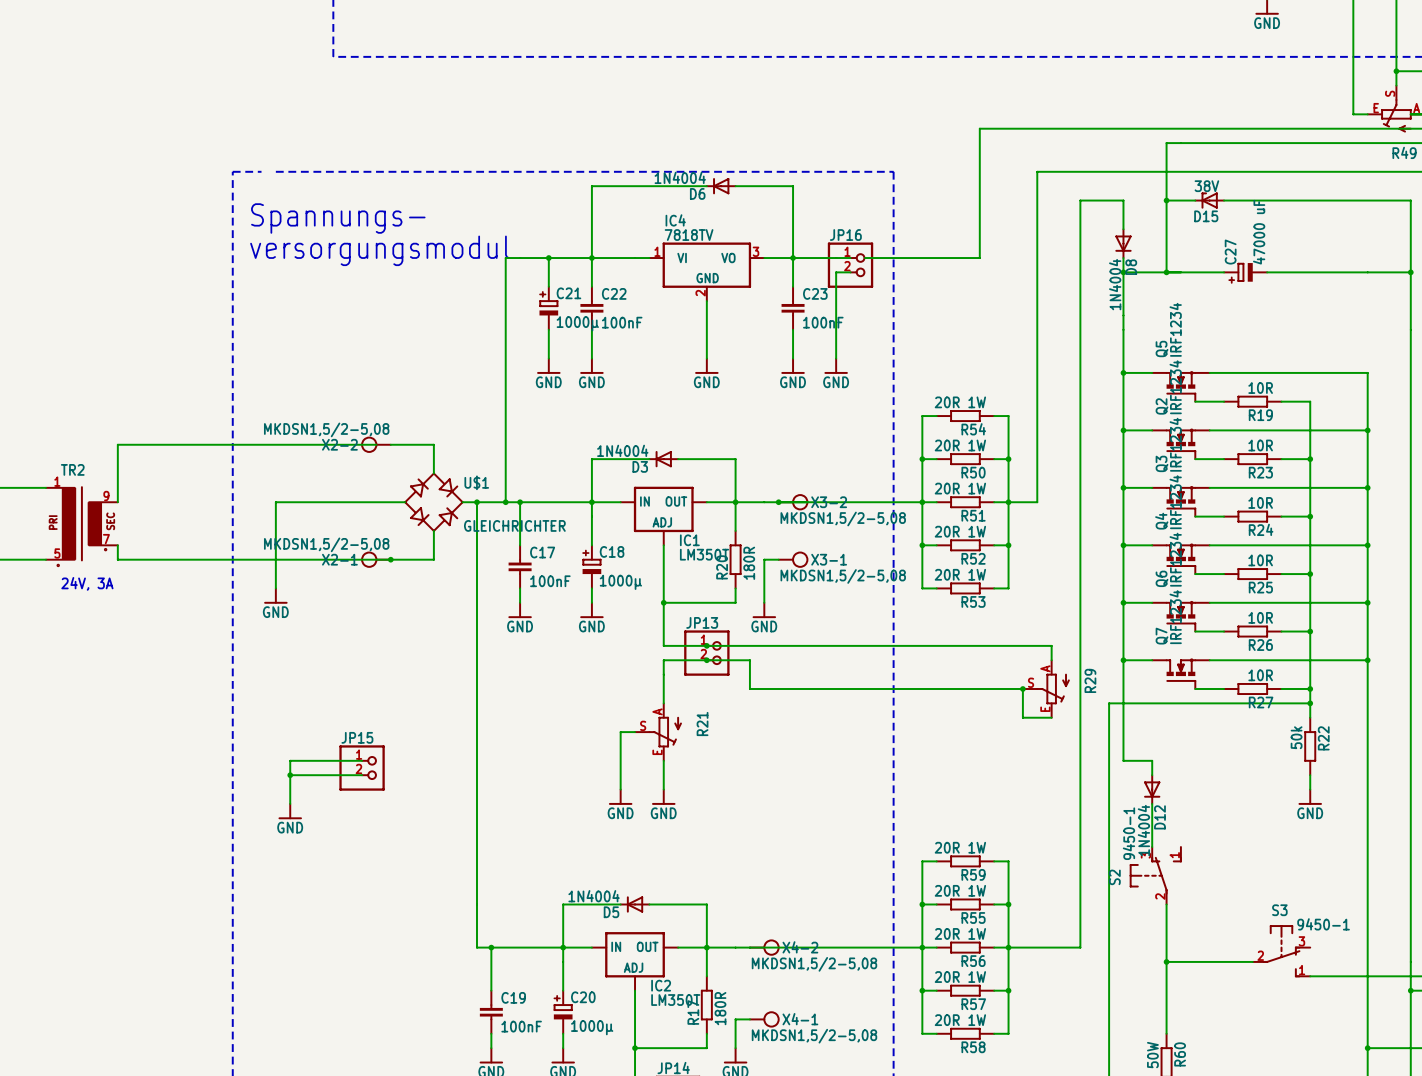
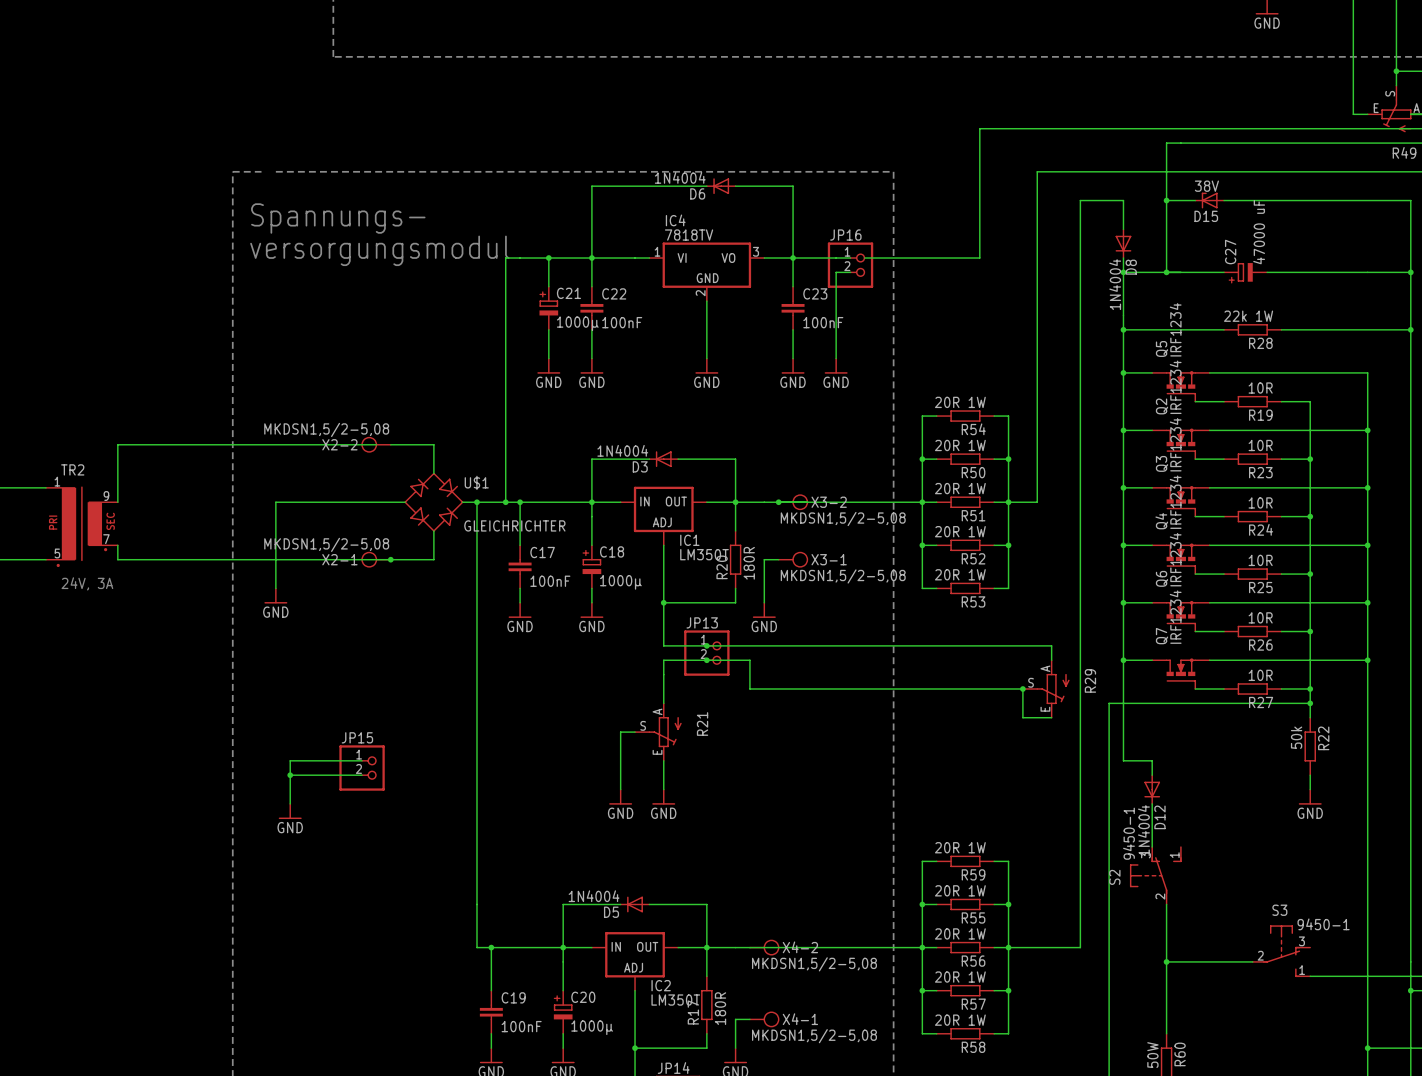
wire: none -> (1123, 329) (1224, 329)
junction: none -> (1123, 329)
R28: none -> 22k 1W (1252, 329)
wire: none -> (1281, 329) (1410, 329)
junction: none -> (1410, 329)

